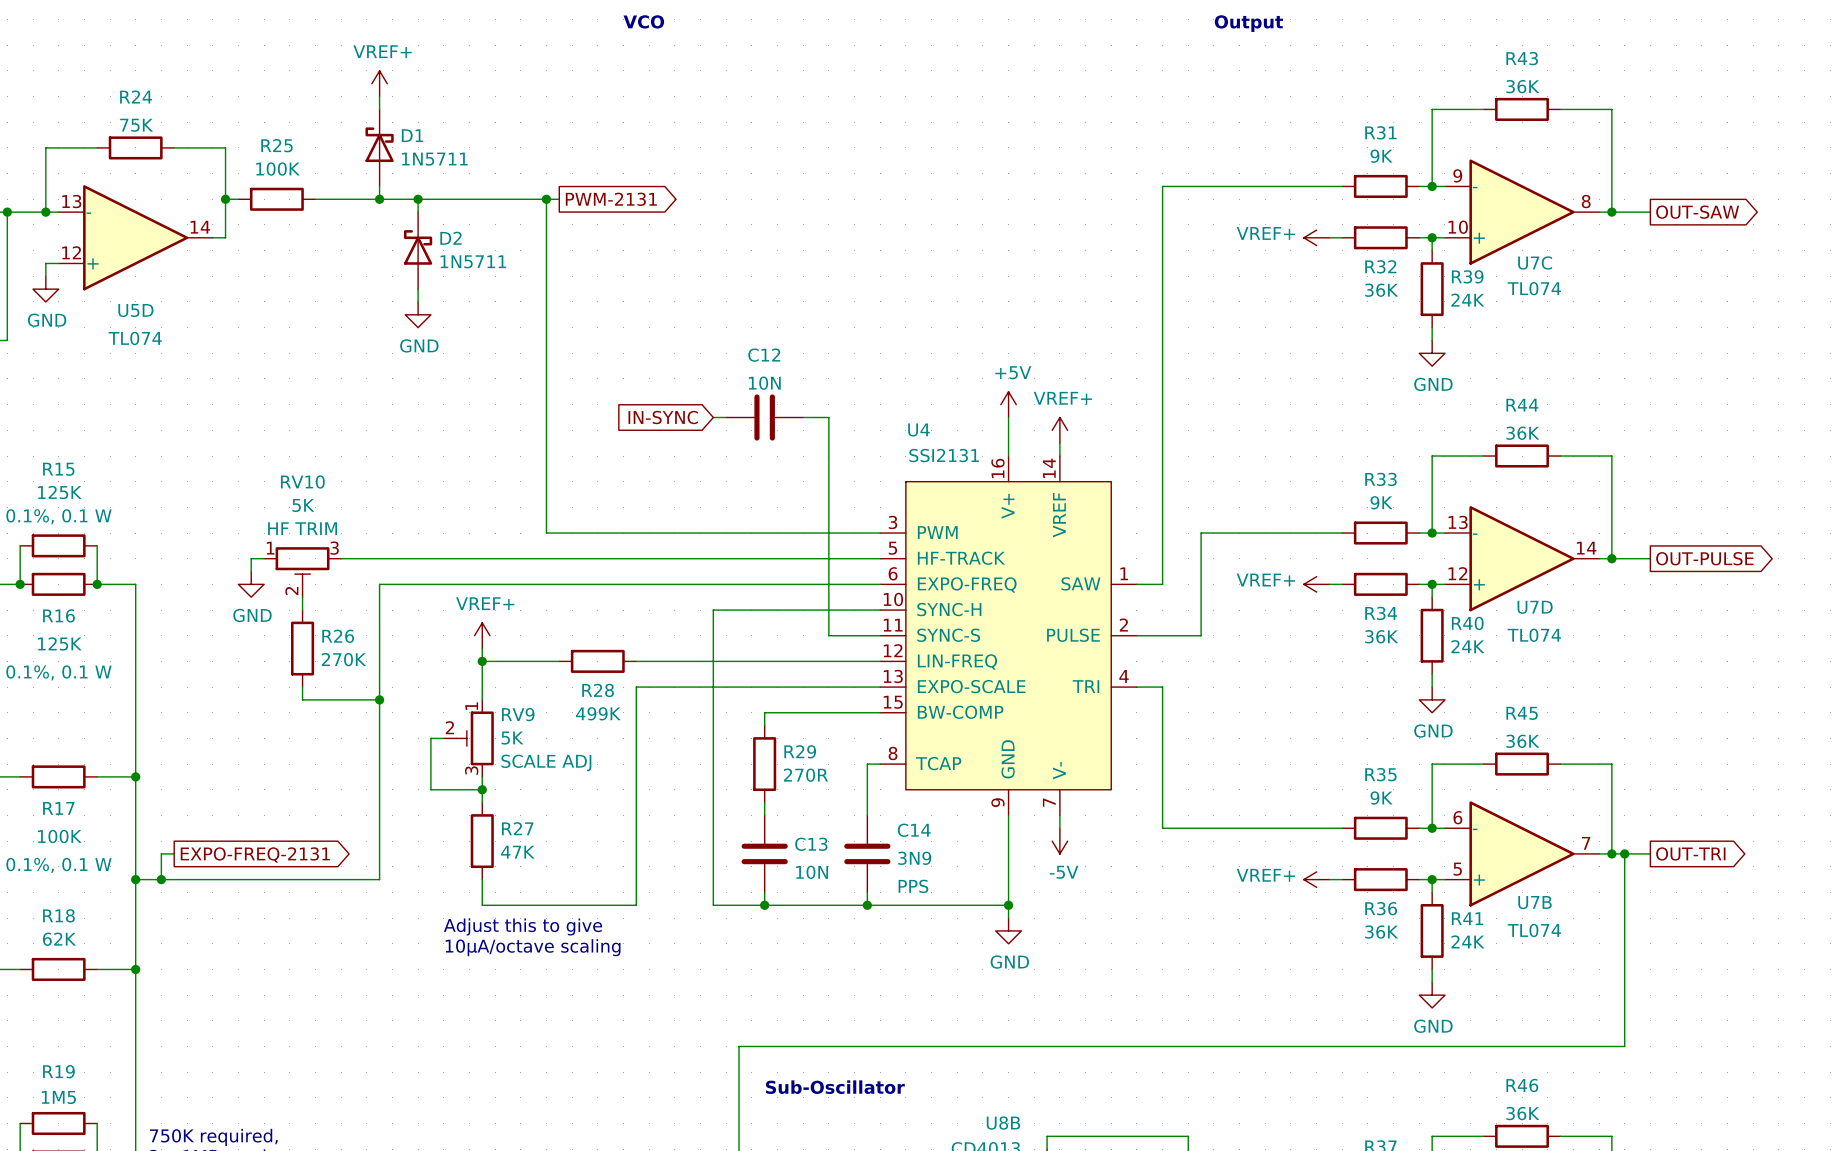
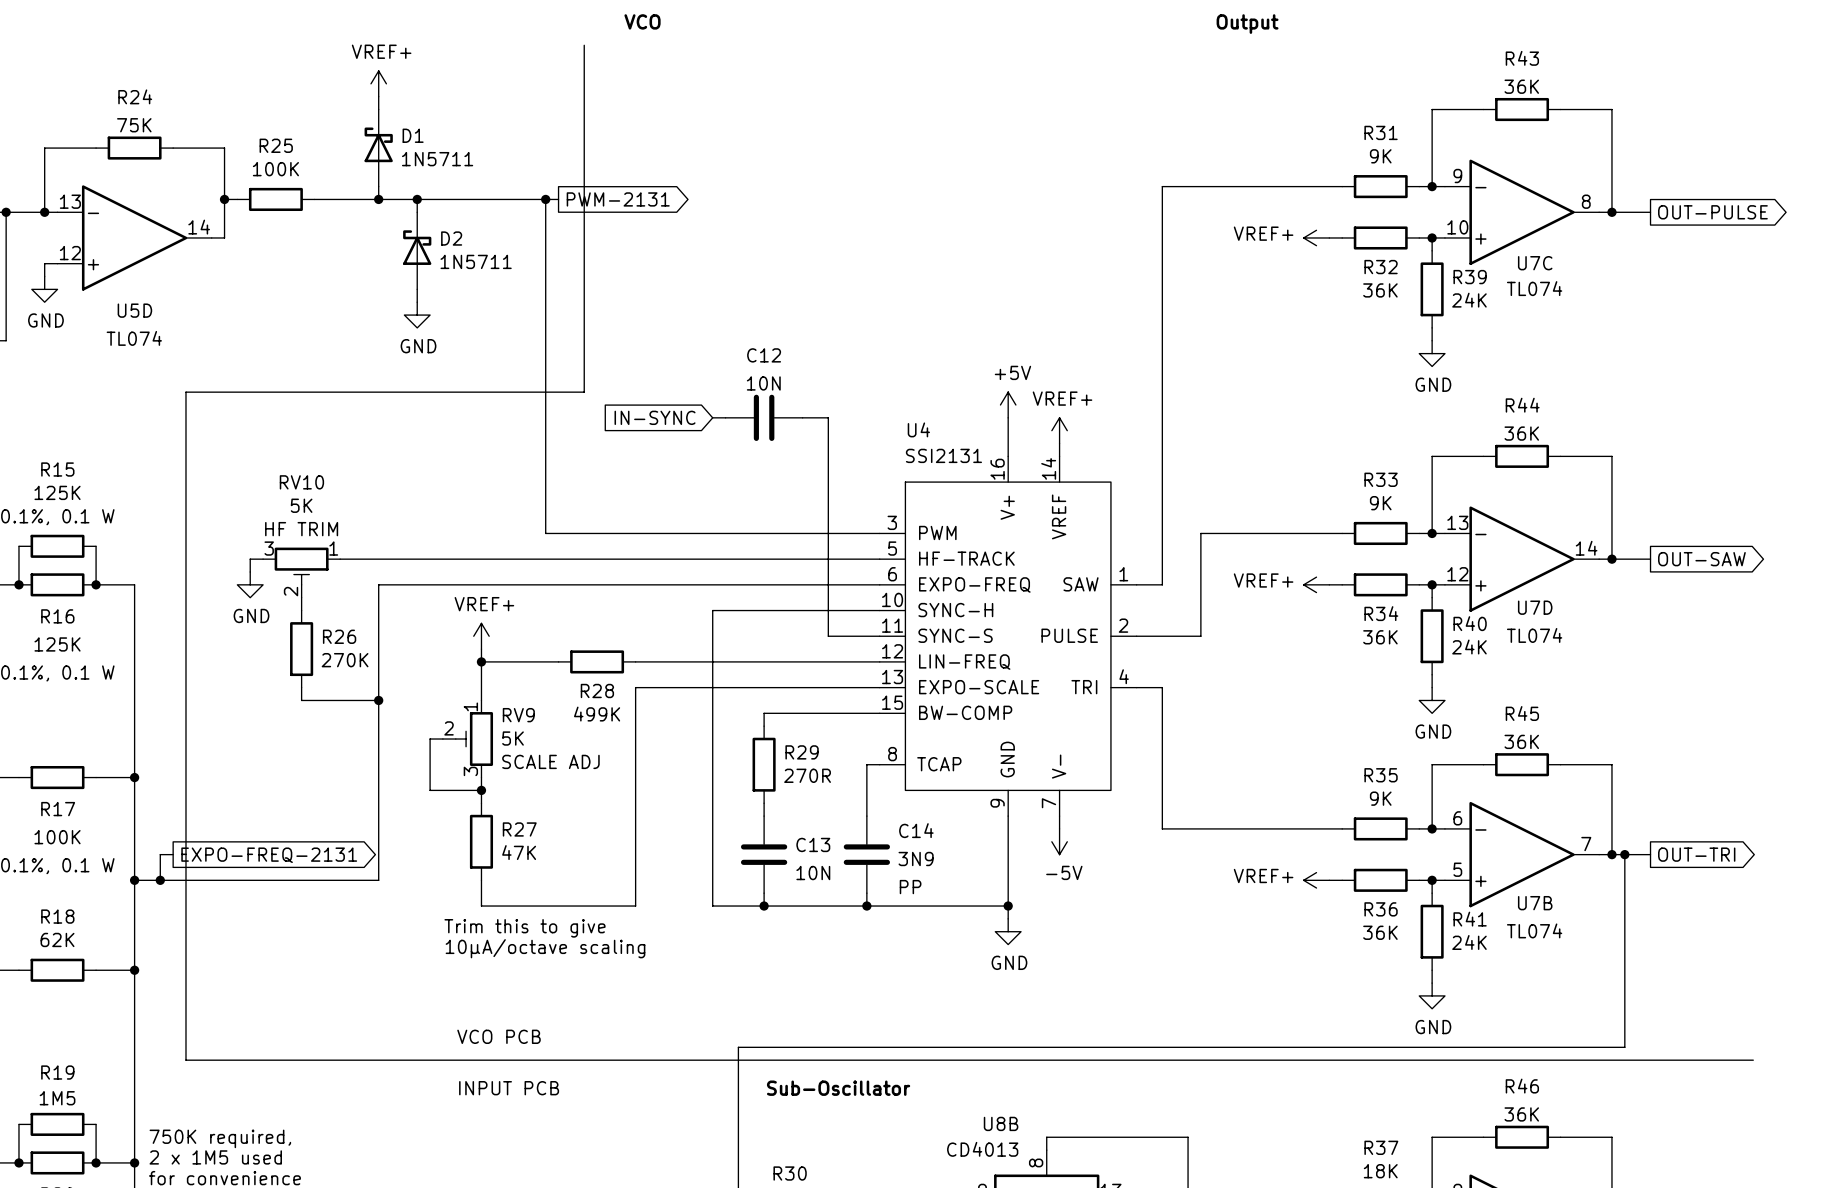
line: none -> (584, 45) (584, 392) (185, 392) (185, 1060) (1753, 1060)
global label: OUT-SAW (1697, 212) -> OUT-PULSE (1712, 212)
global label: OUT-PULSE (1704, 558) -> OUT-SAW (1701, 559)
RV10 flip: as is (302, 565) -> left-right (301, 566)
C14 text: PPS (913, 886) -> PP (910, 887)
text: Adjust this to give (522, 927) -> Trim this to give (525, 928)
text: none -> VCO PCB (499, 1036)
text: none -> INPUT PCB (509, 1088)

